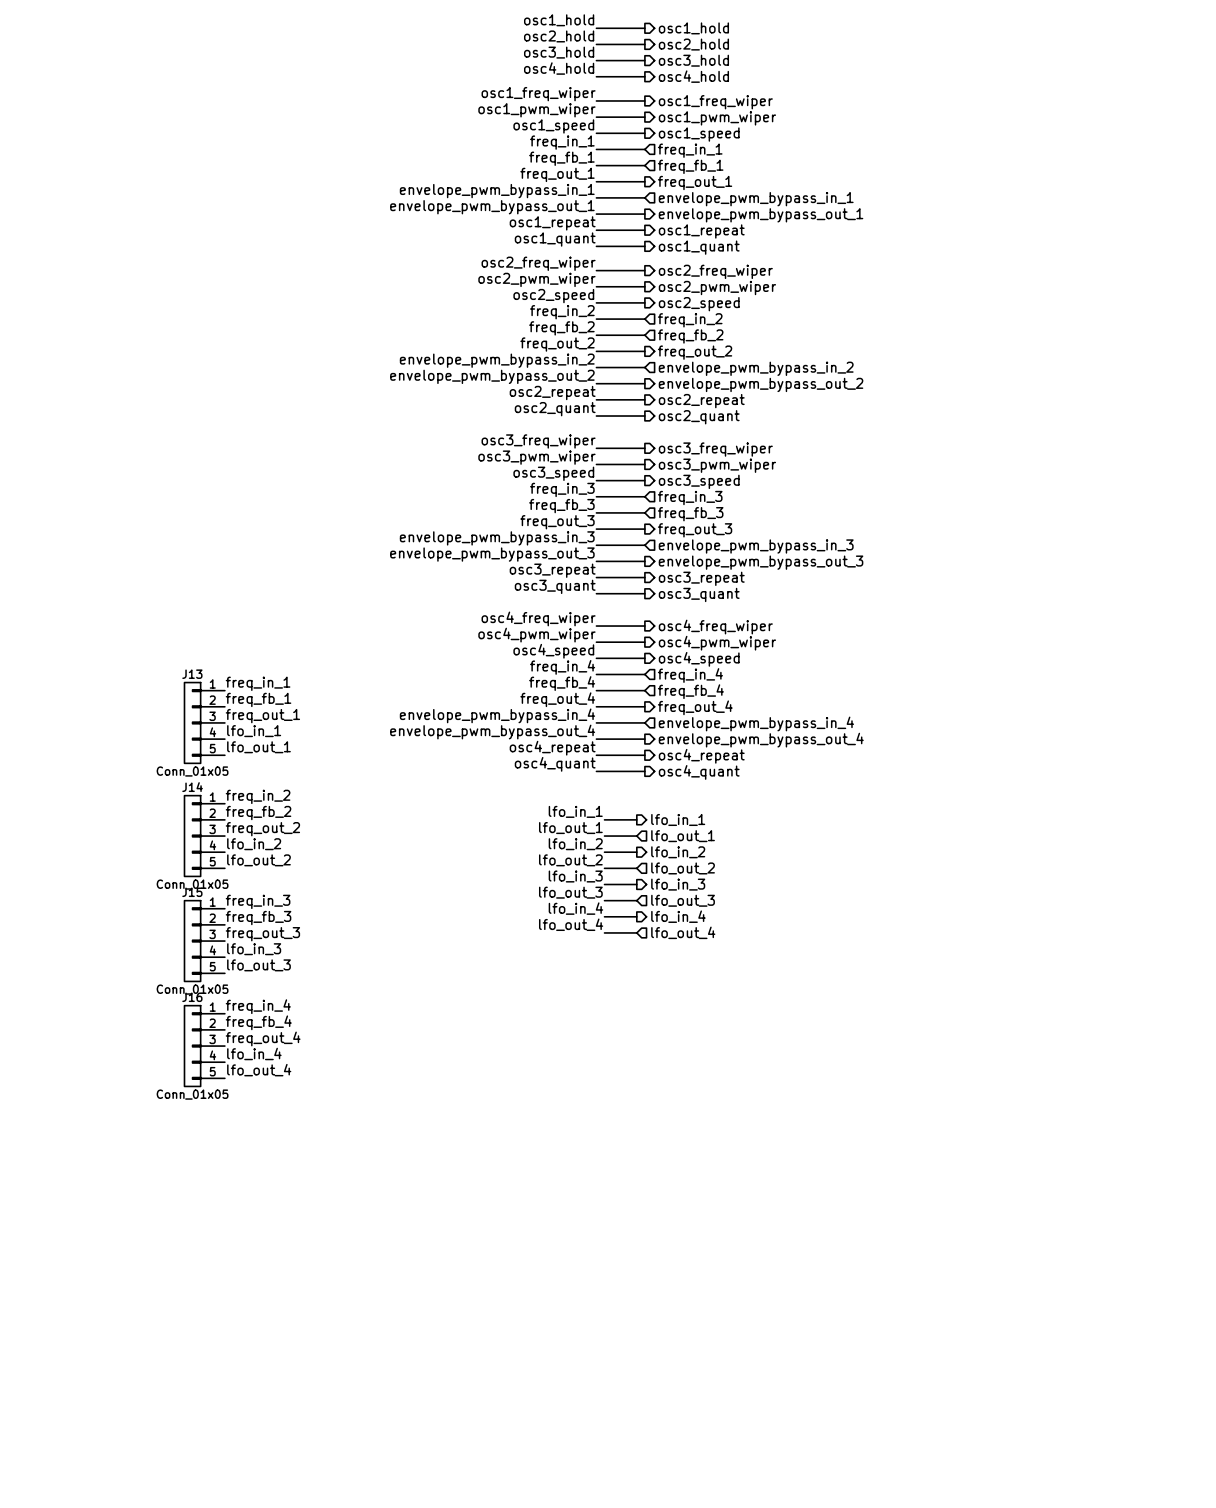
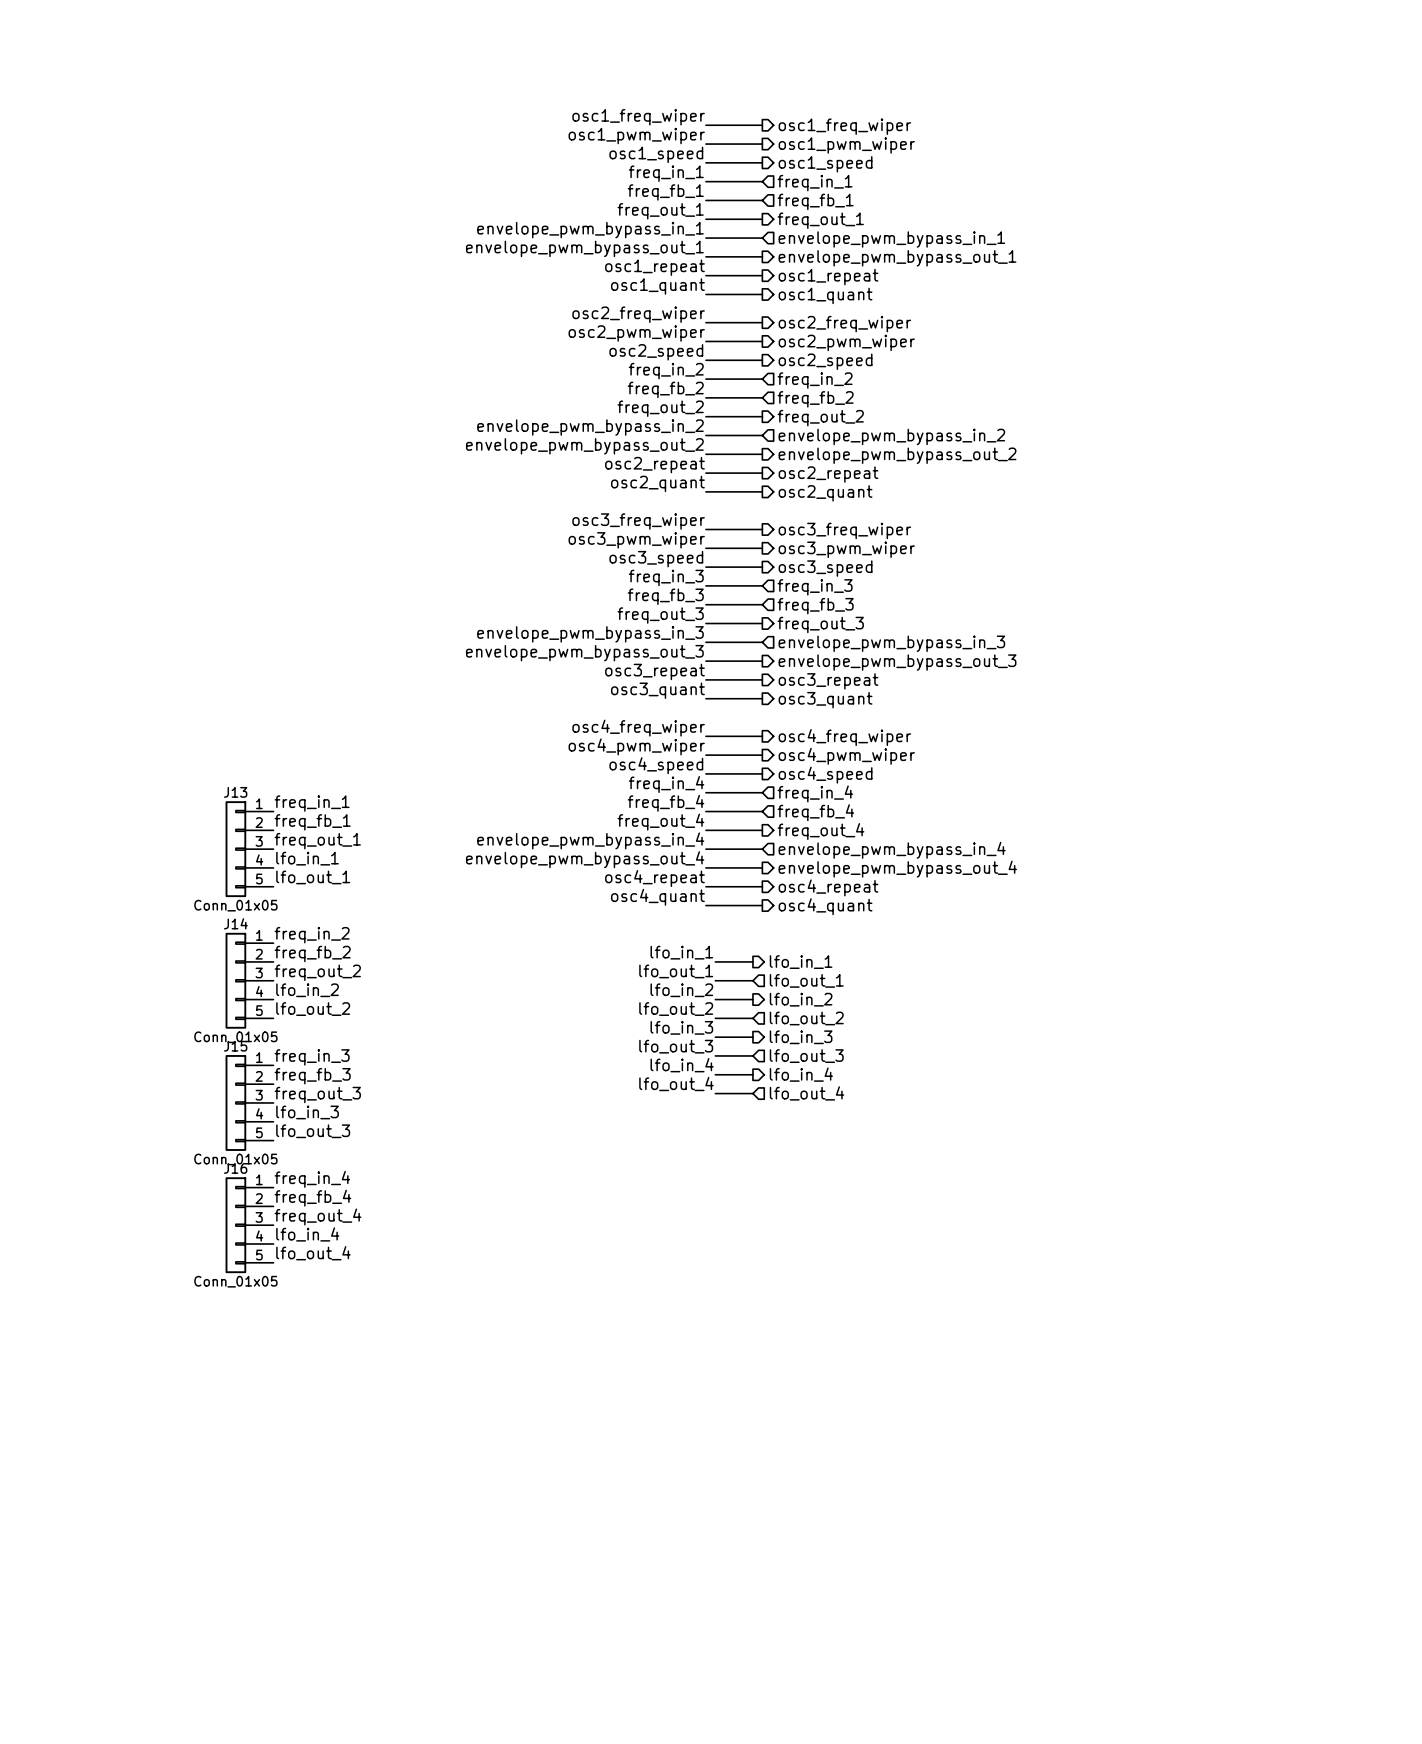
label: osc1_hold (559, 20) -> none
wire: (596, 28) (644, 28) -> none
hierarchical label: osc1_hold (693, 28) -> none
label: osc2_hold (559, 36) -> none
wire: (596, 44) (644, 44) -> none
hierarchical label: osc2_hold (693, 44) -> none
label: osc3_hold (559, 52) -> none
wire: (596, 60) (644, 60) -> none
hierarchical label: osc3_hold (693, 60) -> none
label: osc4_hold (559, 68) -> none
wire: (596, 76) (644, 76) -> none
hierarchical label: osc4_hold (693, 76) -> none

